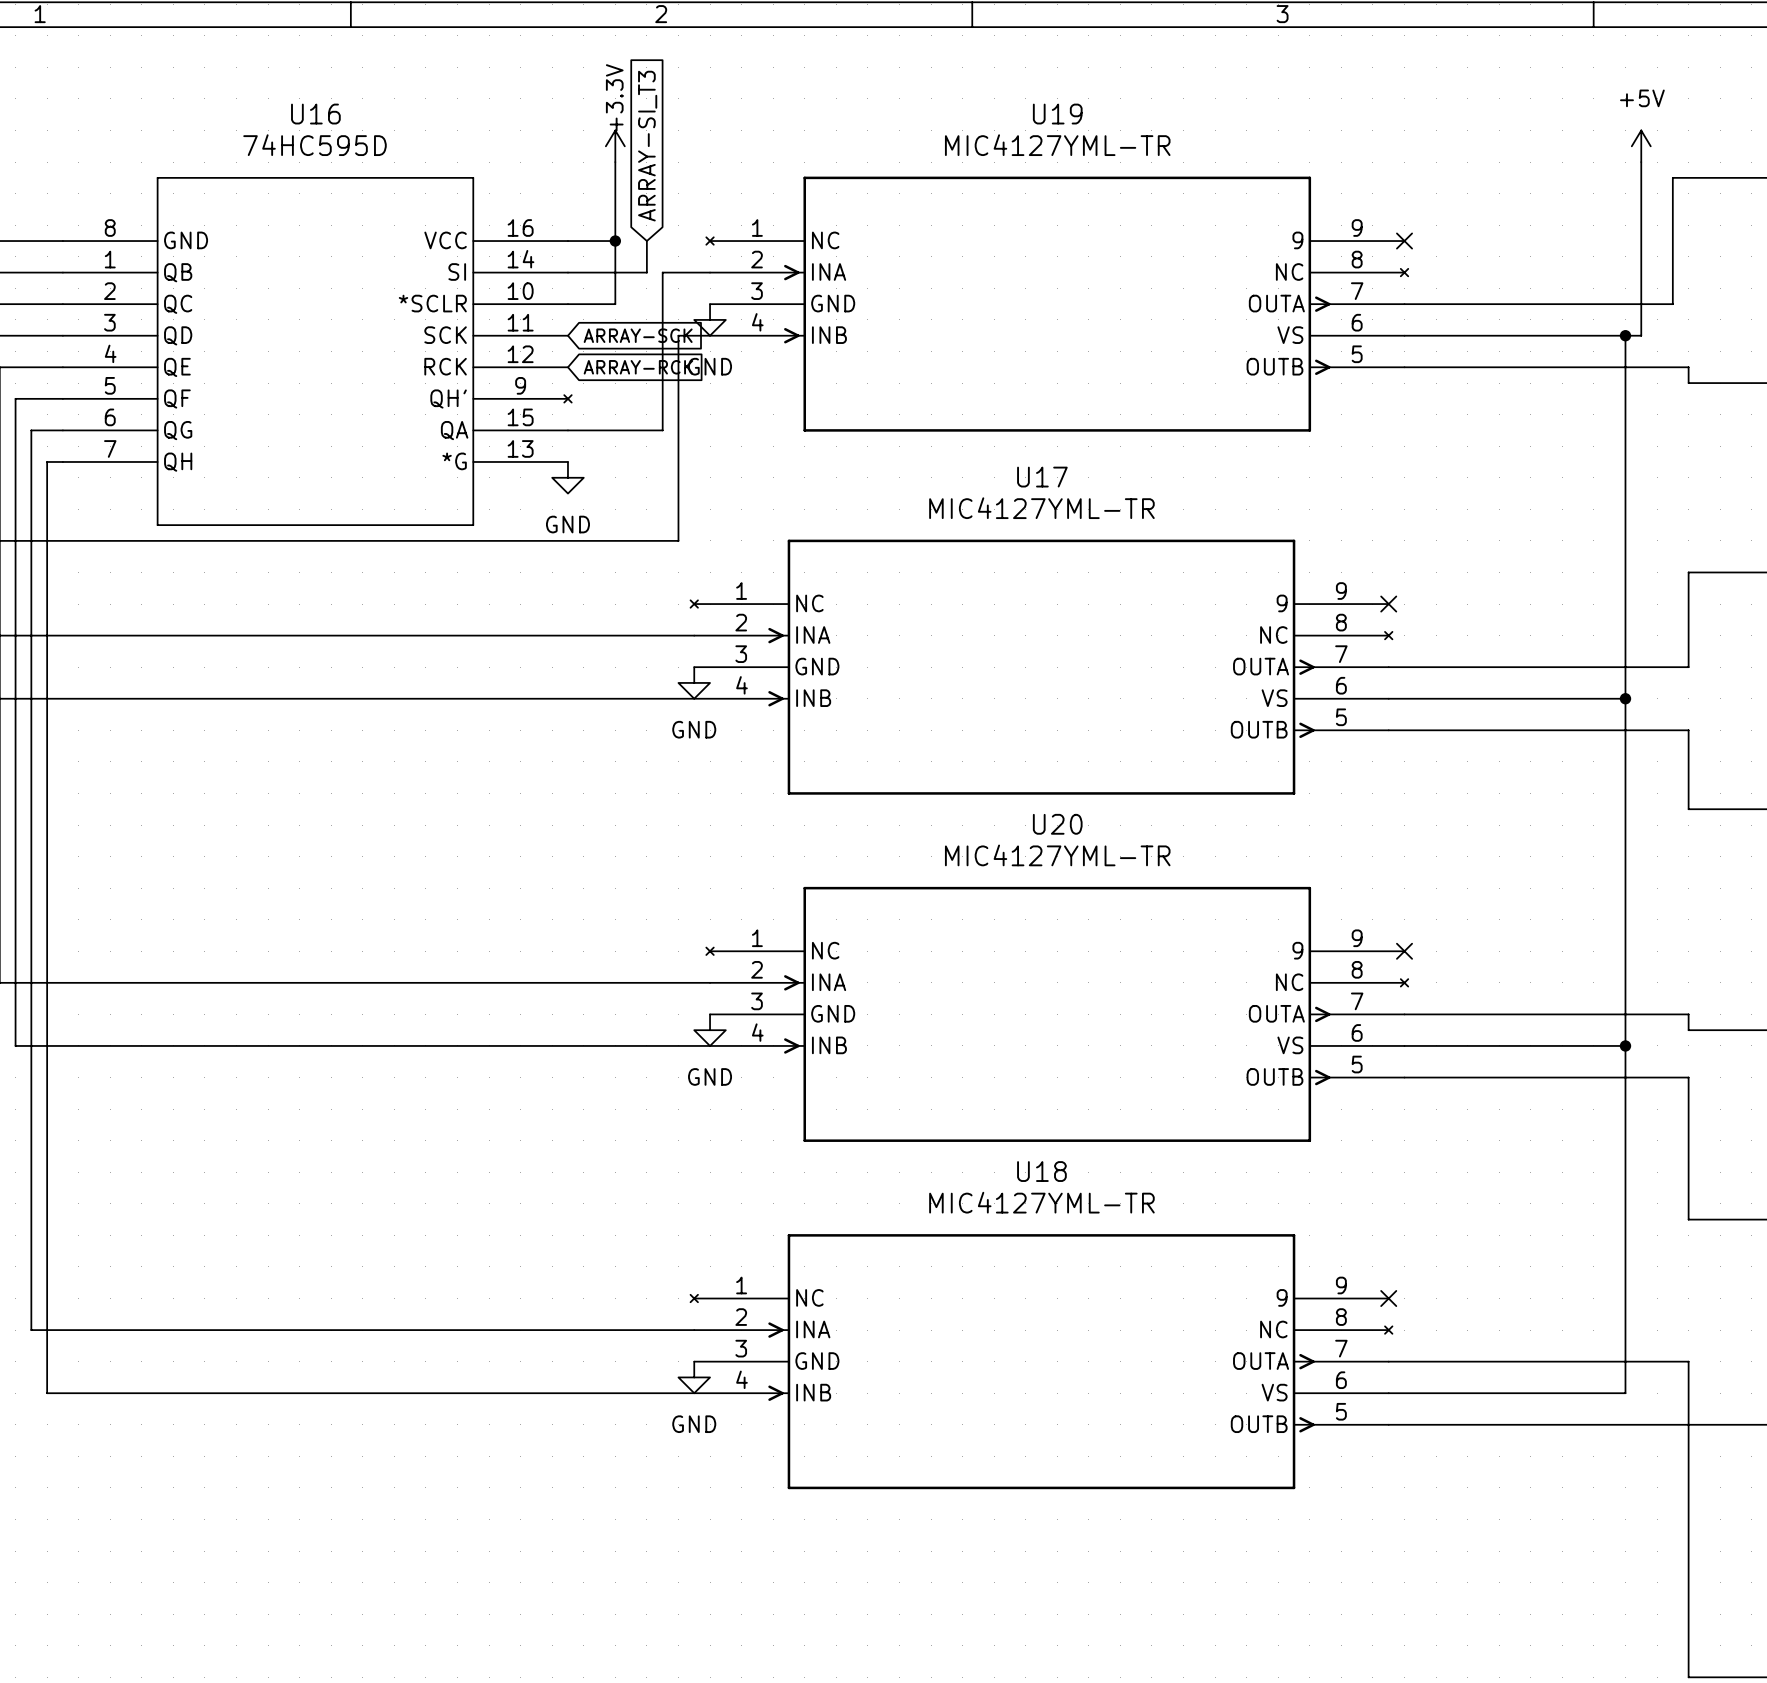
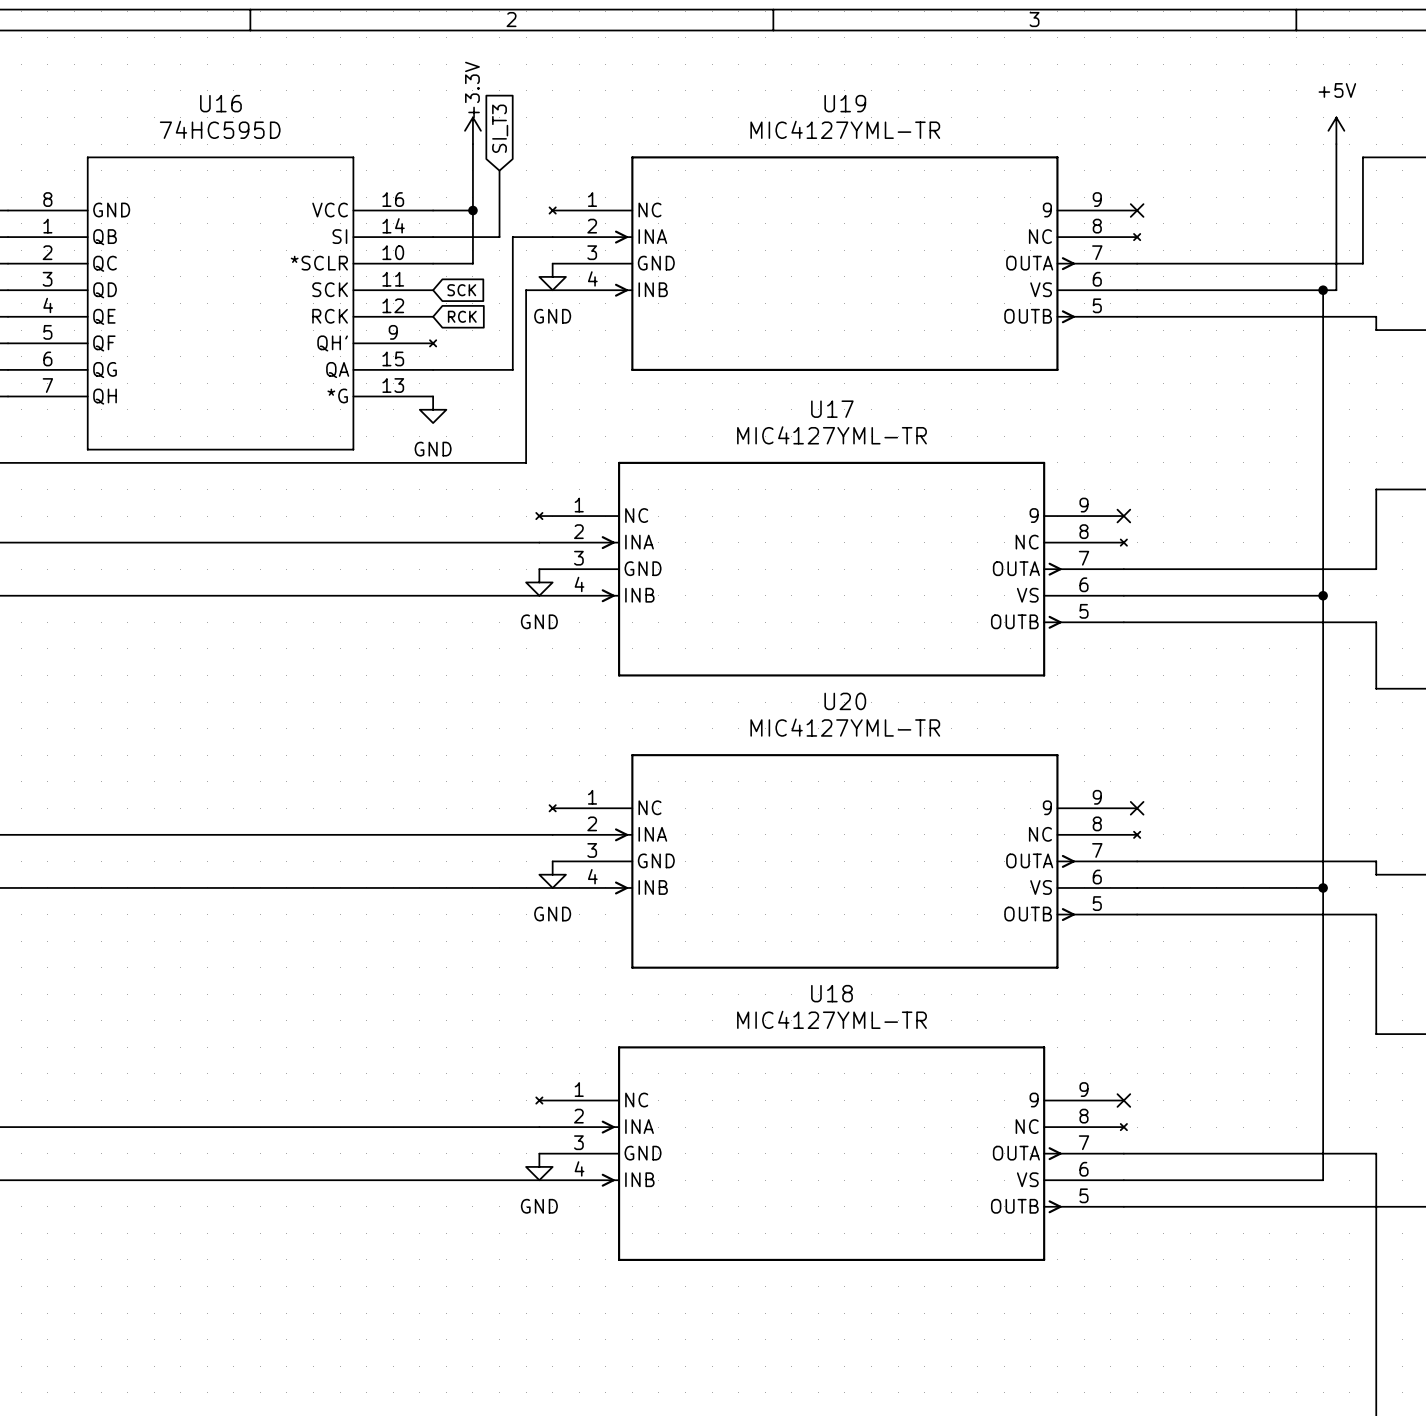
global label: ARRAY-SI_T3 (647, 146) -> SI_T3 (500, 128)
wire: none -> (499, 170) (499, 210)
global label: ARRAY-SCK (638, 335) -> SCK (461, 290)
global label: ARRAY-RCK (638, 367) -> RCK (462, 316)

